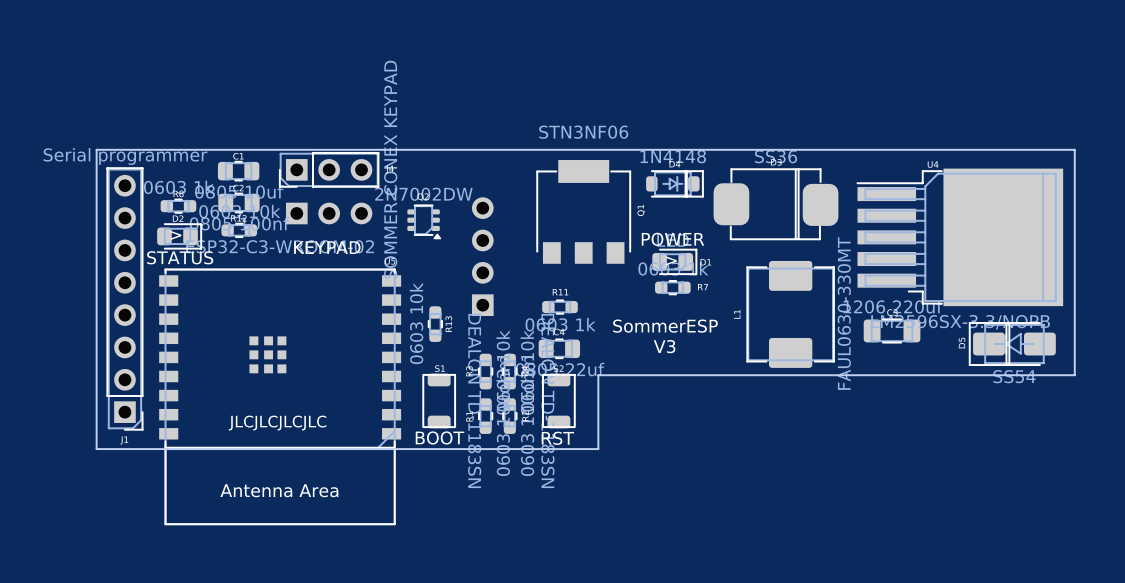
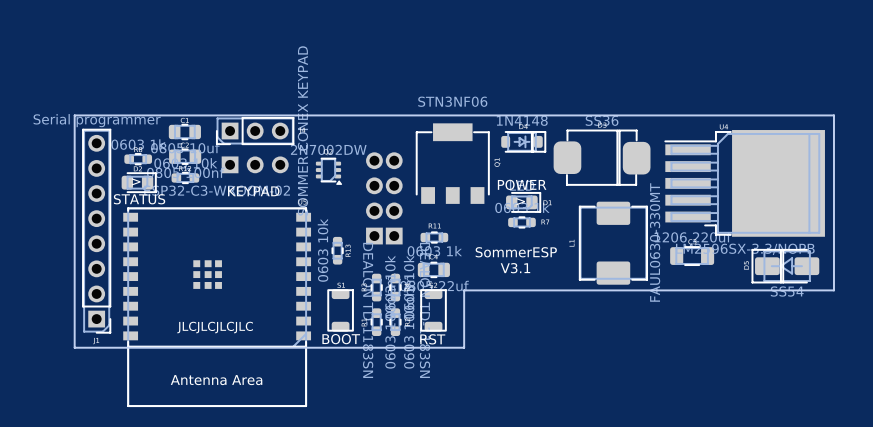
part: none -> (394, 198)
text: V3 (664, 346) -> V3.1 (515, 268)

